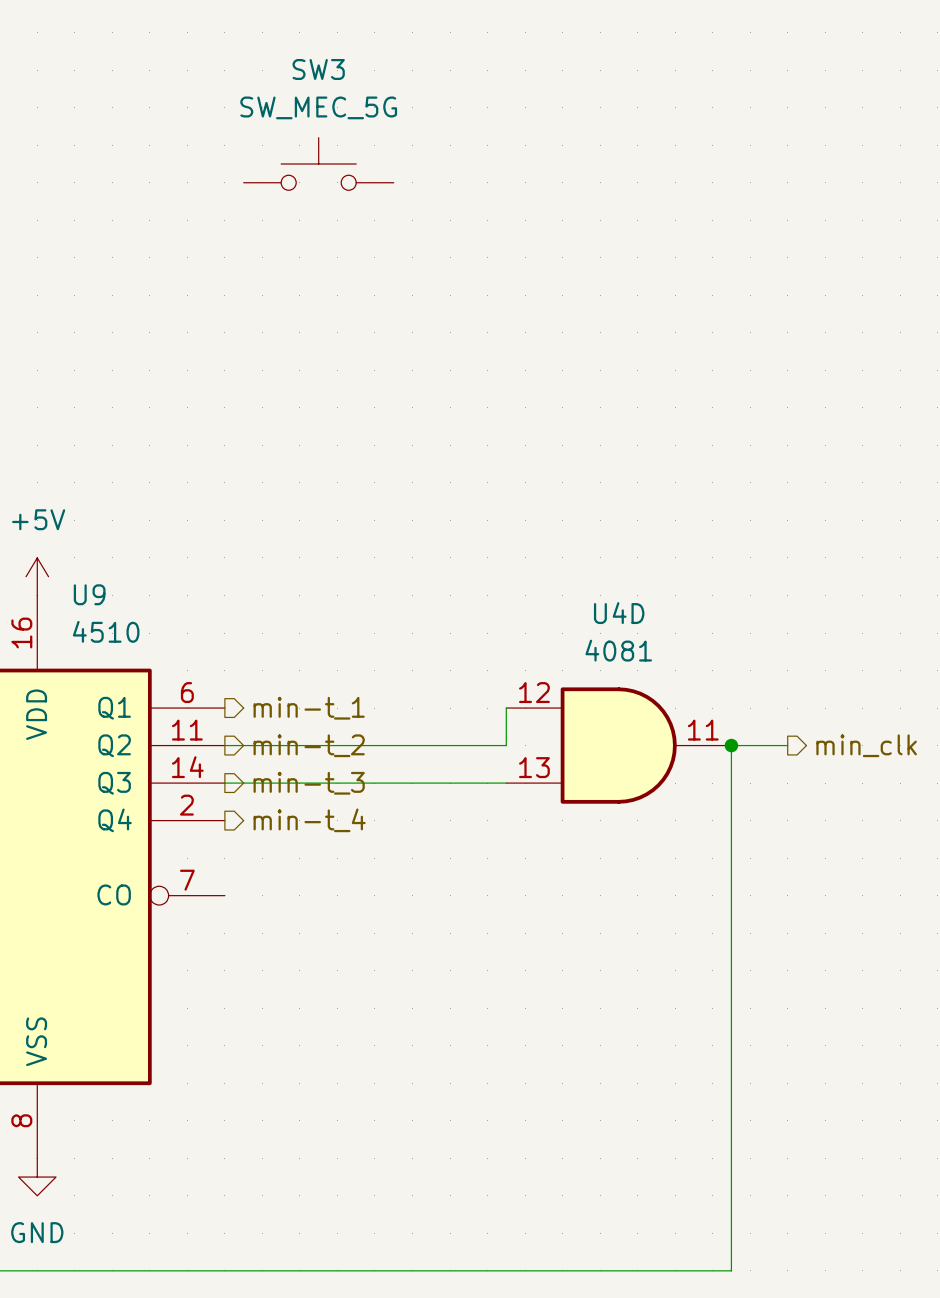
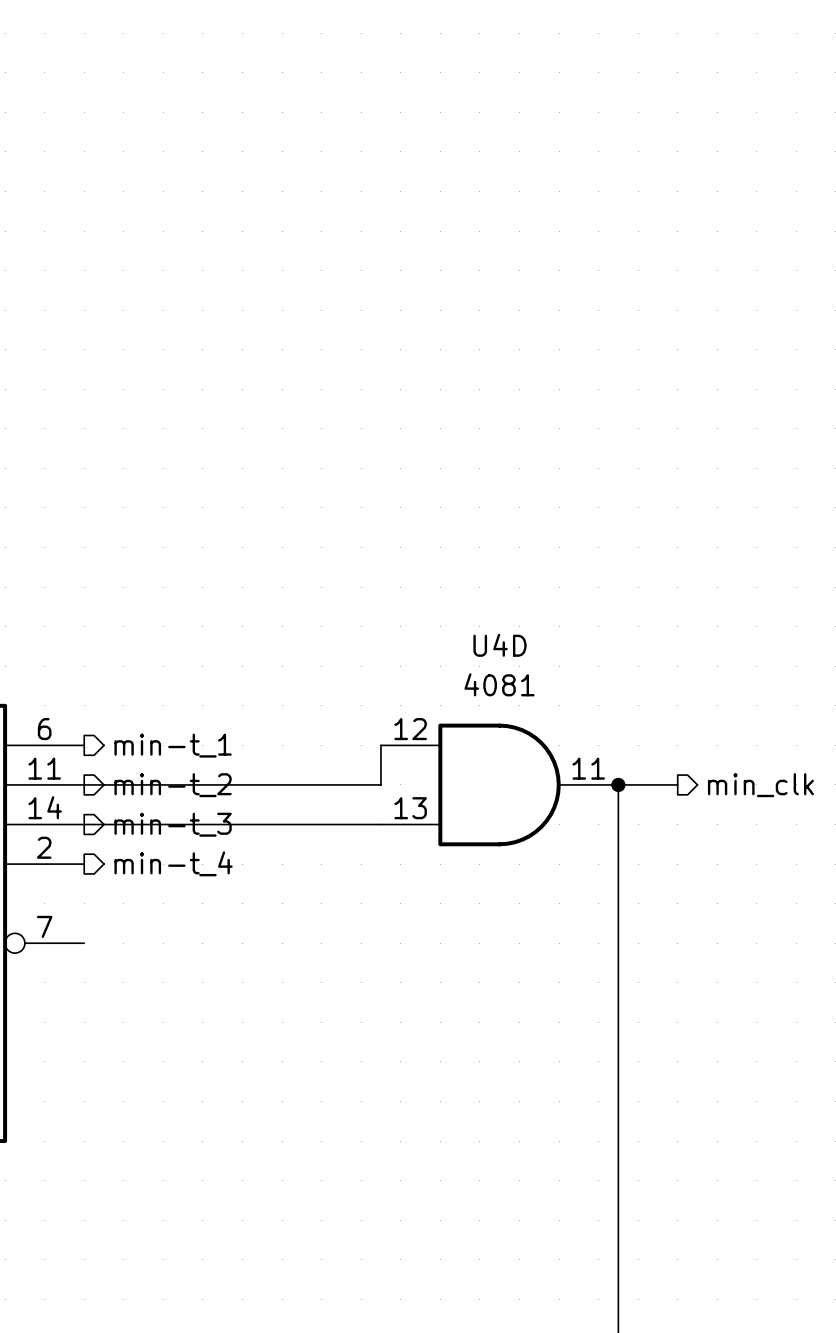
SW3: SW_MEC_5G (318, 163) -> none

